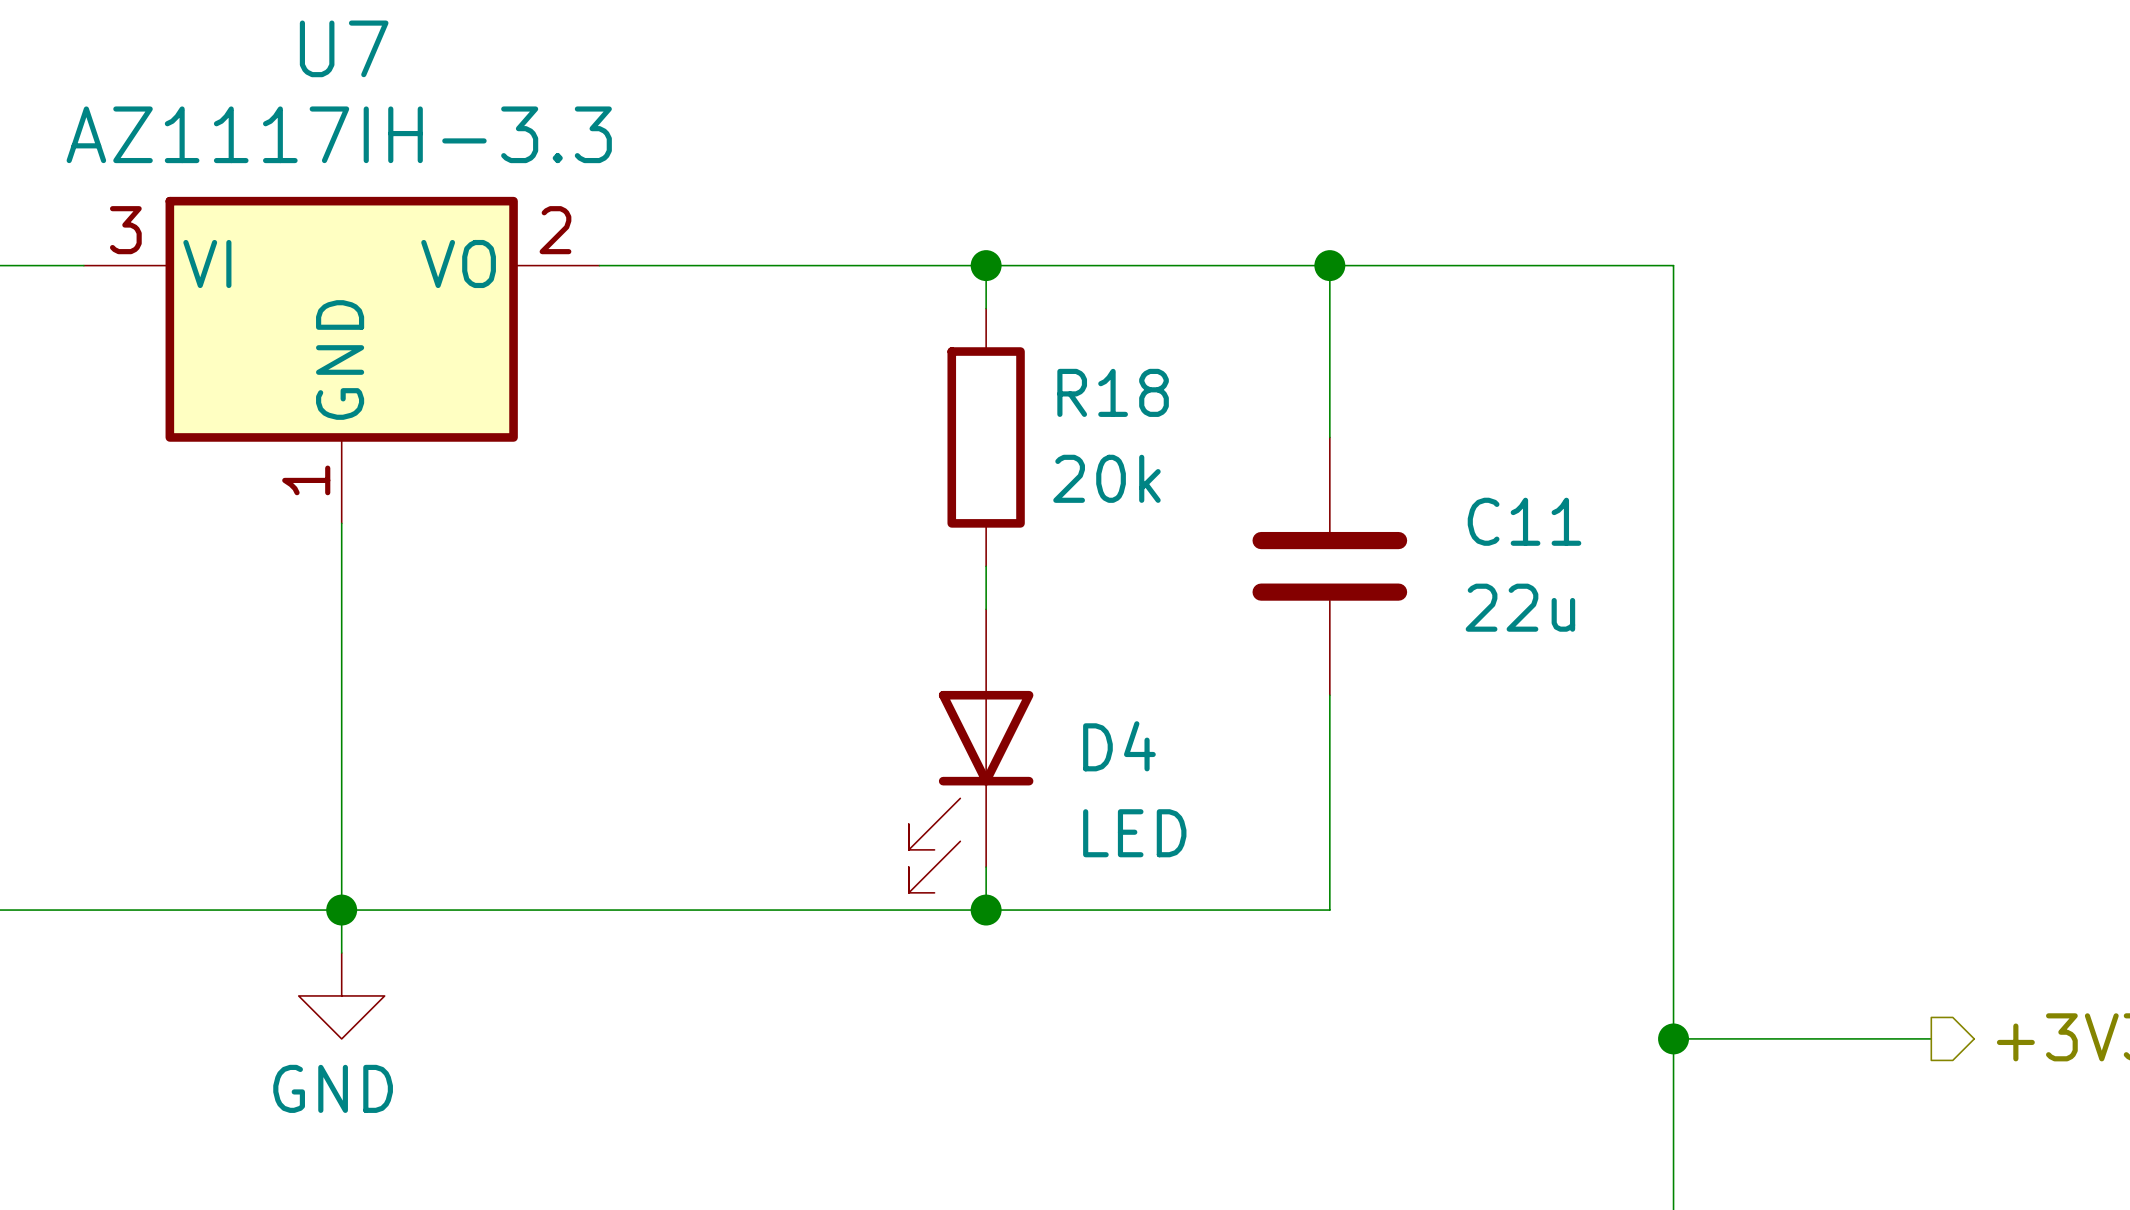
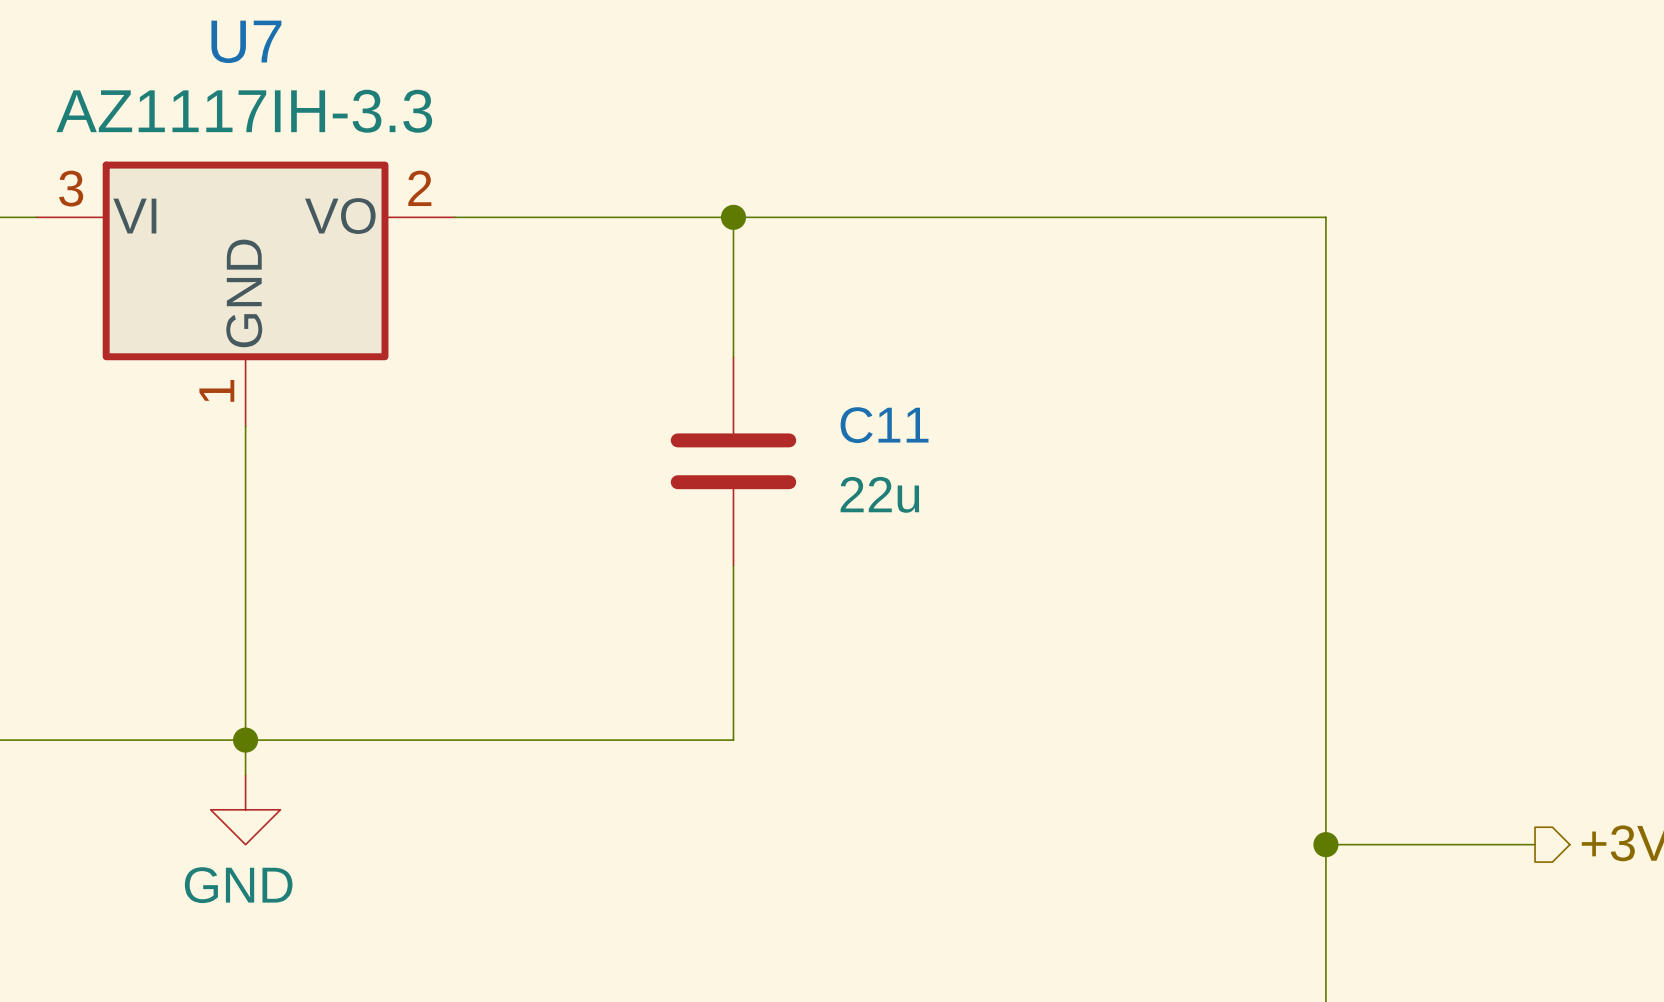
wire: (986, 265) (986, 308) -> none
junction position: (986, 265) -> (733, 217)
wire: (1329, 265) (1329, 437) -> (733, 217) (733, 356)
junction: (1329, 265) -> none
R18: 20k (986, 437) -> none
wire: (986, 566) (986, 609) -> none
C11 position: (1329, 566) -> (733, 461)
wire: (1329, 695) (1329, 910) (943, 910) -> (733, 565) (733, 740)
D4: LED (971, 751) -> none
wire: (986, 867) (986, 910) -> none
junction: (986, 910) -> none

